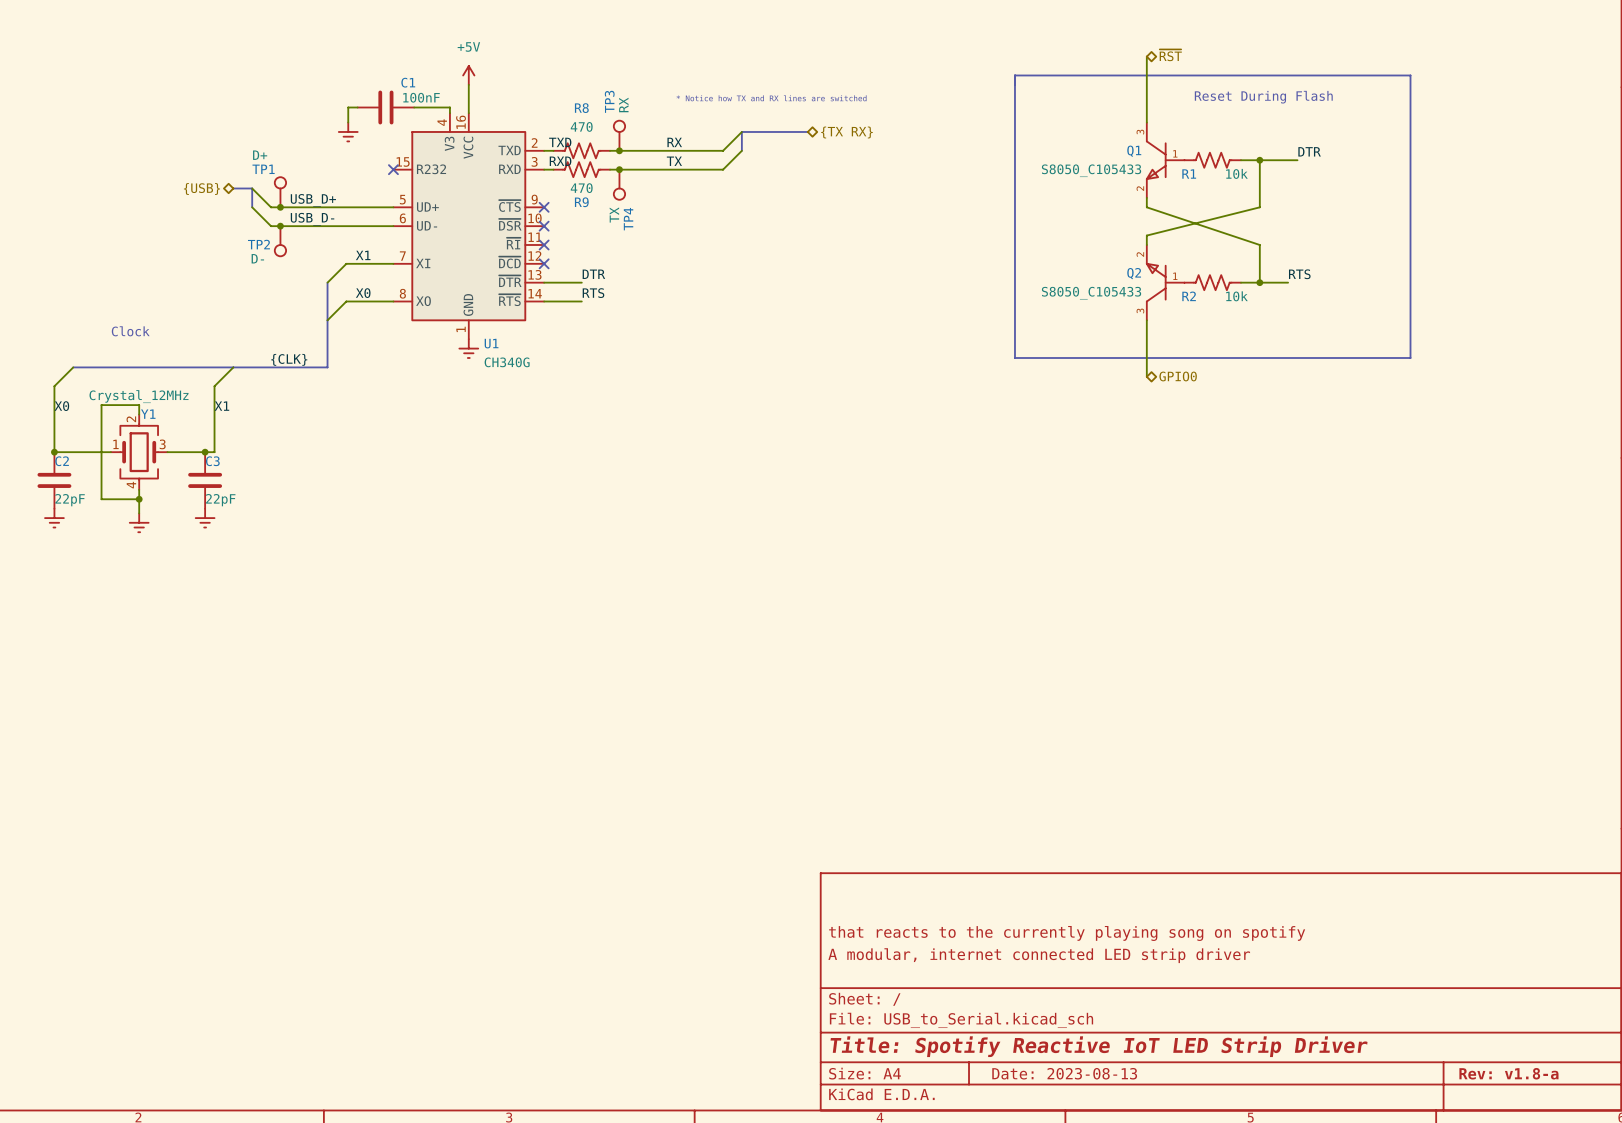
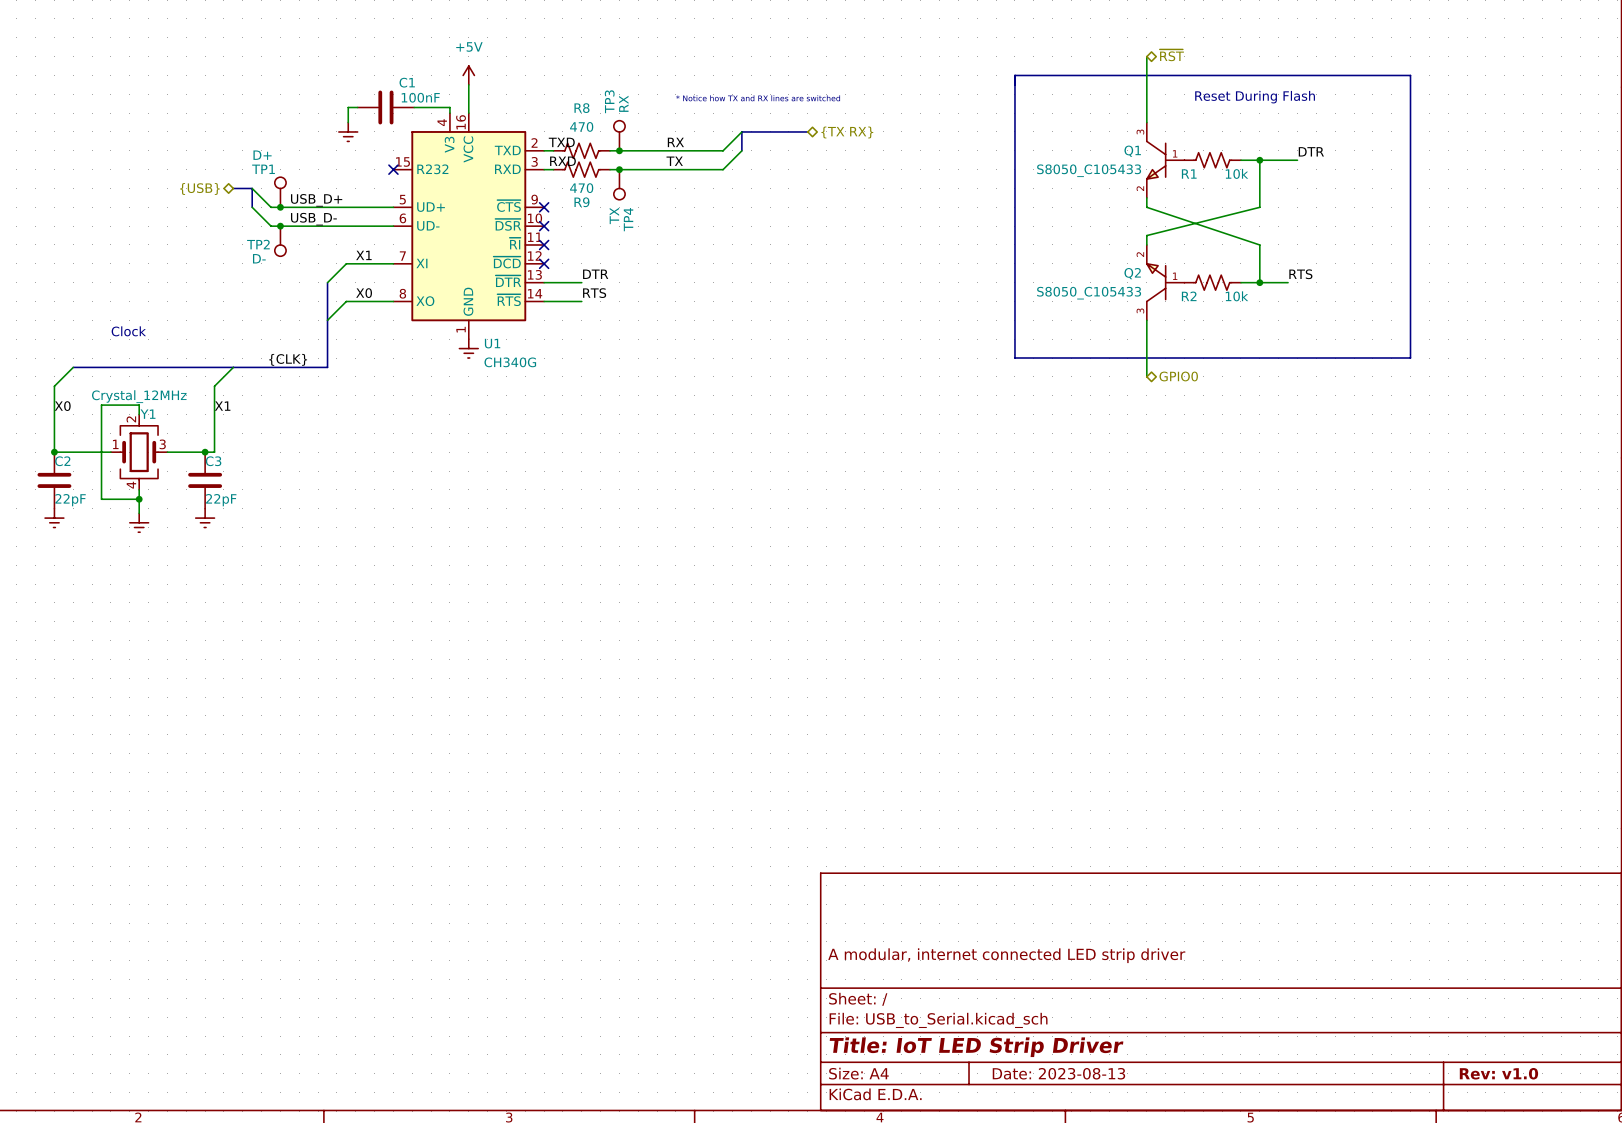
title block: that reacts to the currently playing song on spotify (1067, 933) -> none
title block: Title: Spotify Reactive IoT LED Strip Driver (1099, 1046) -> Title: IoT LED Strip Driver (976, 1047)
title block: Rev: v1.8-a (1508, 1073) -> Rev: v1.0 (1498, 1073)

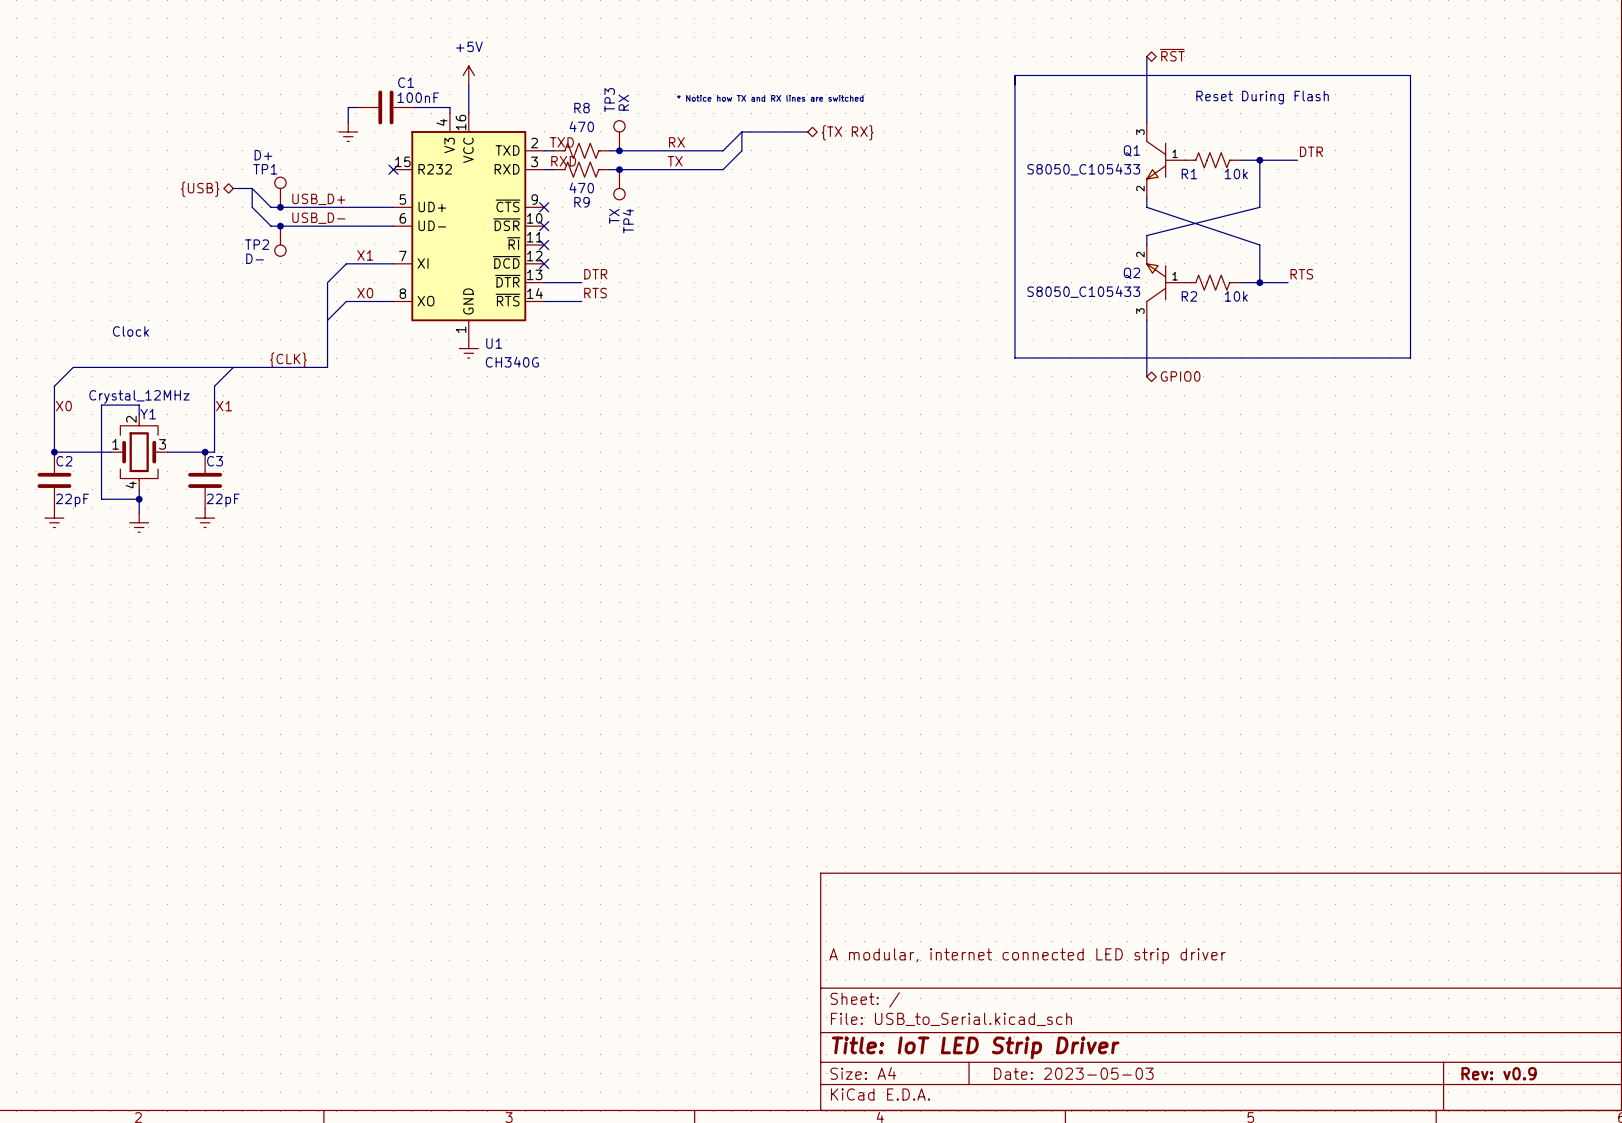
title block: Date: 2023-08-13 (1058, 1073) -> Date: 2023-05-03 (1073, 1073)
title block: Rev: v1.0 (1498, 1073) -> Rev: v0.9 (1499, 1073)

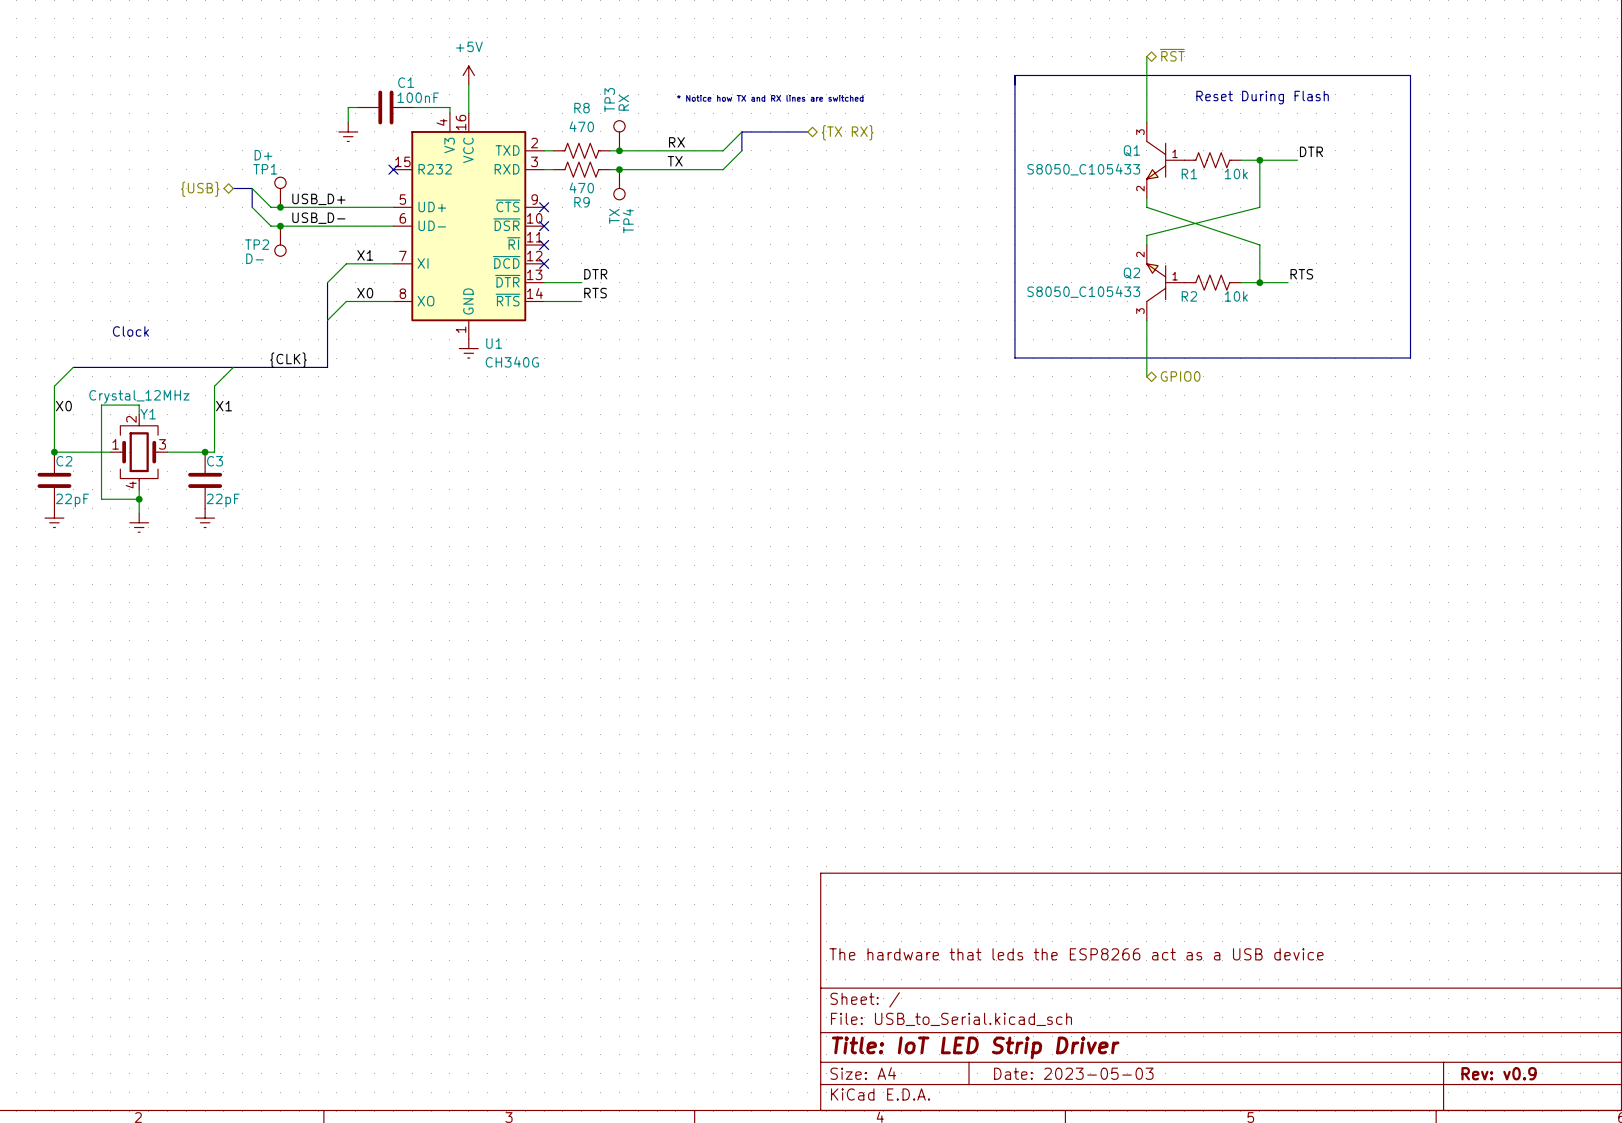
label: TXD (561, 142) -> none
label: RXD (563, 161) -> none
title block: A modular, internet connected LED strip driver (1027, 956) -> The hardware that leds the ESP8266 act as a USB device (1076, 954)

